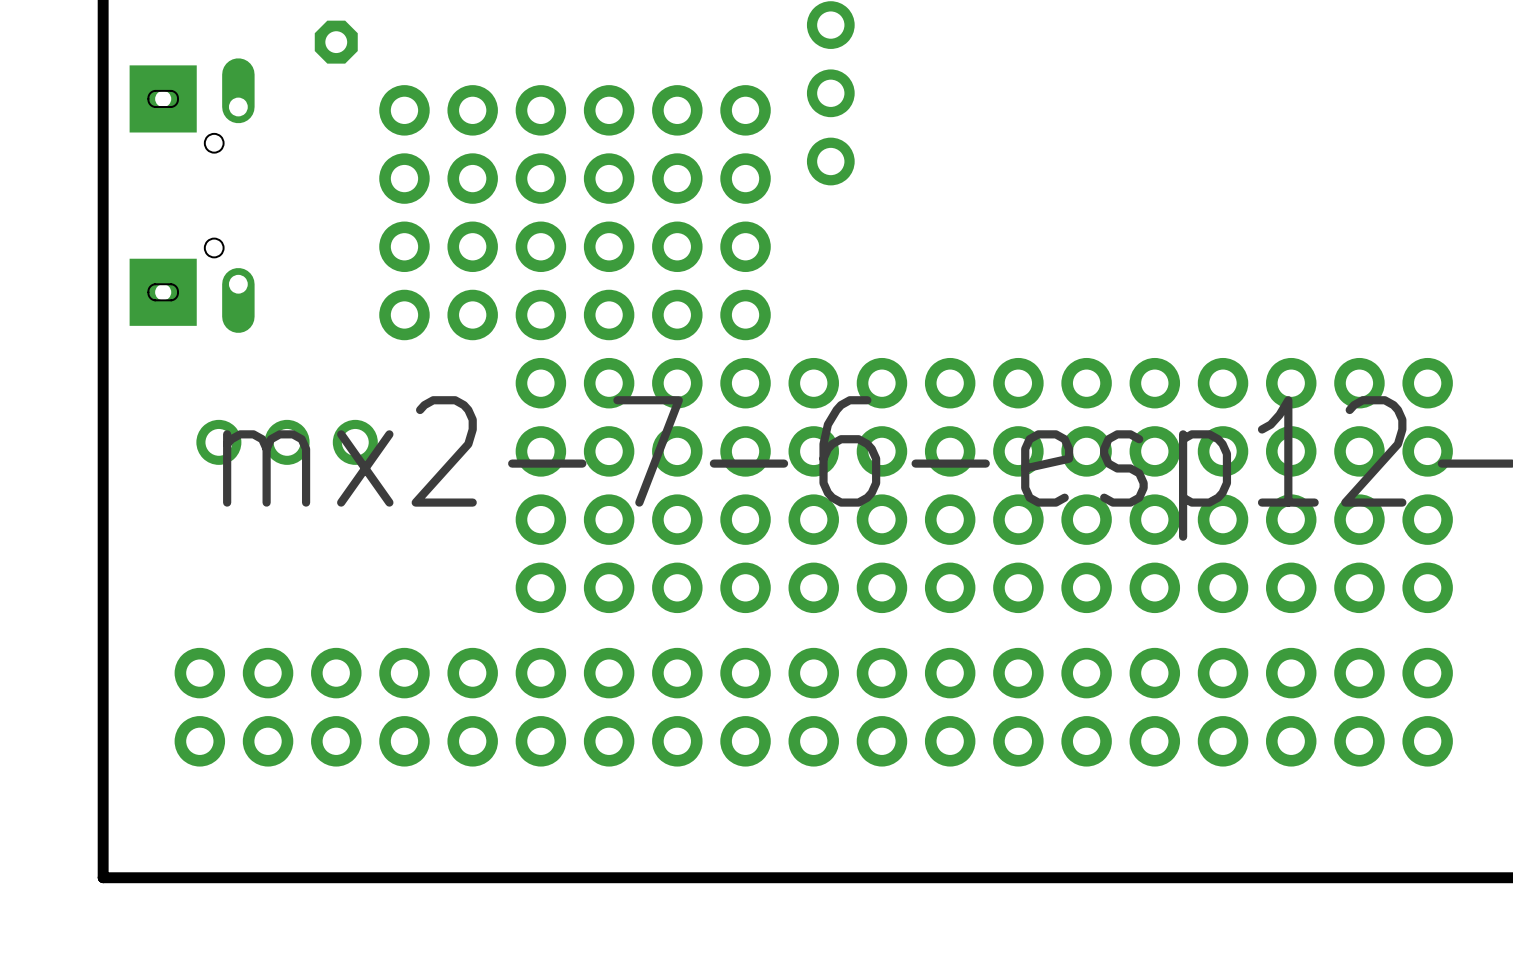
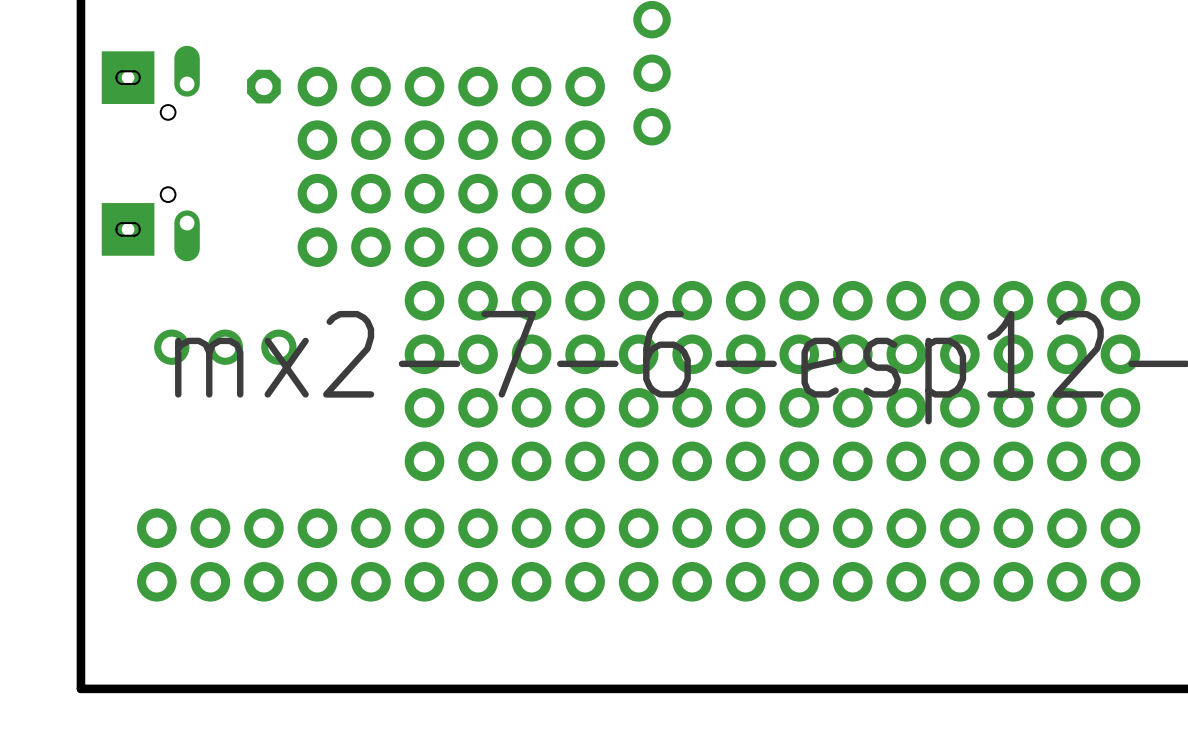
part position: (336, 42) -> (263, 86)

